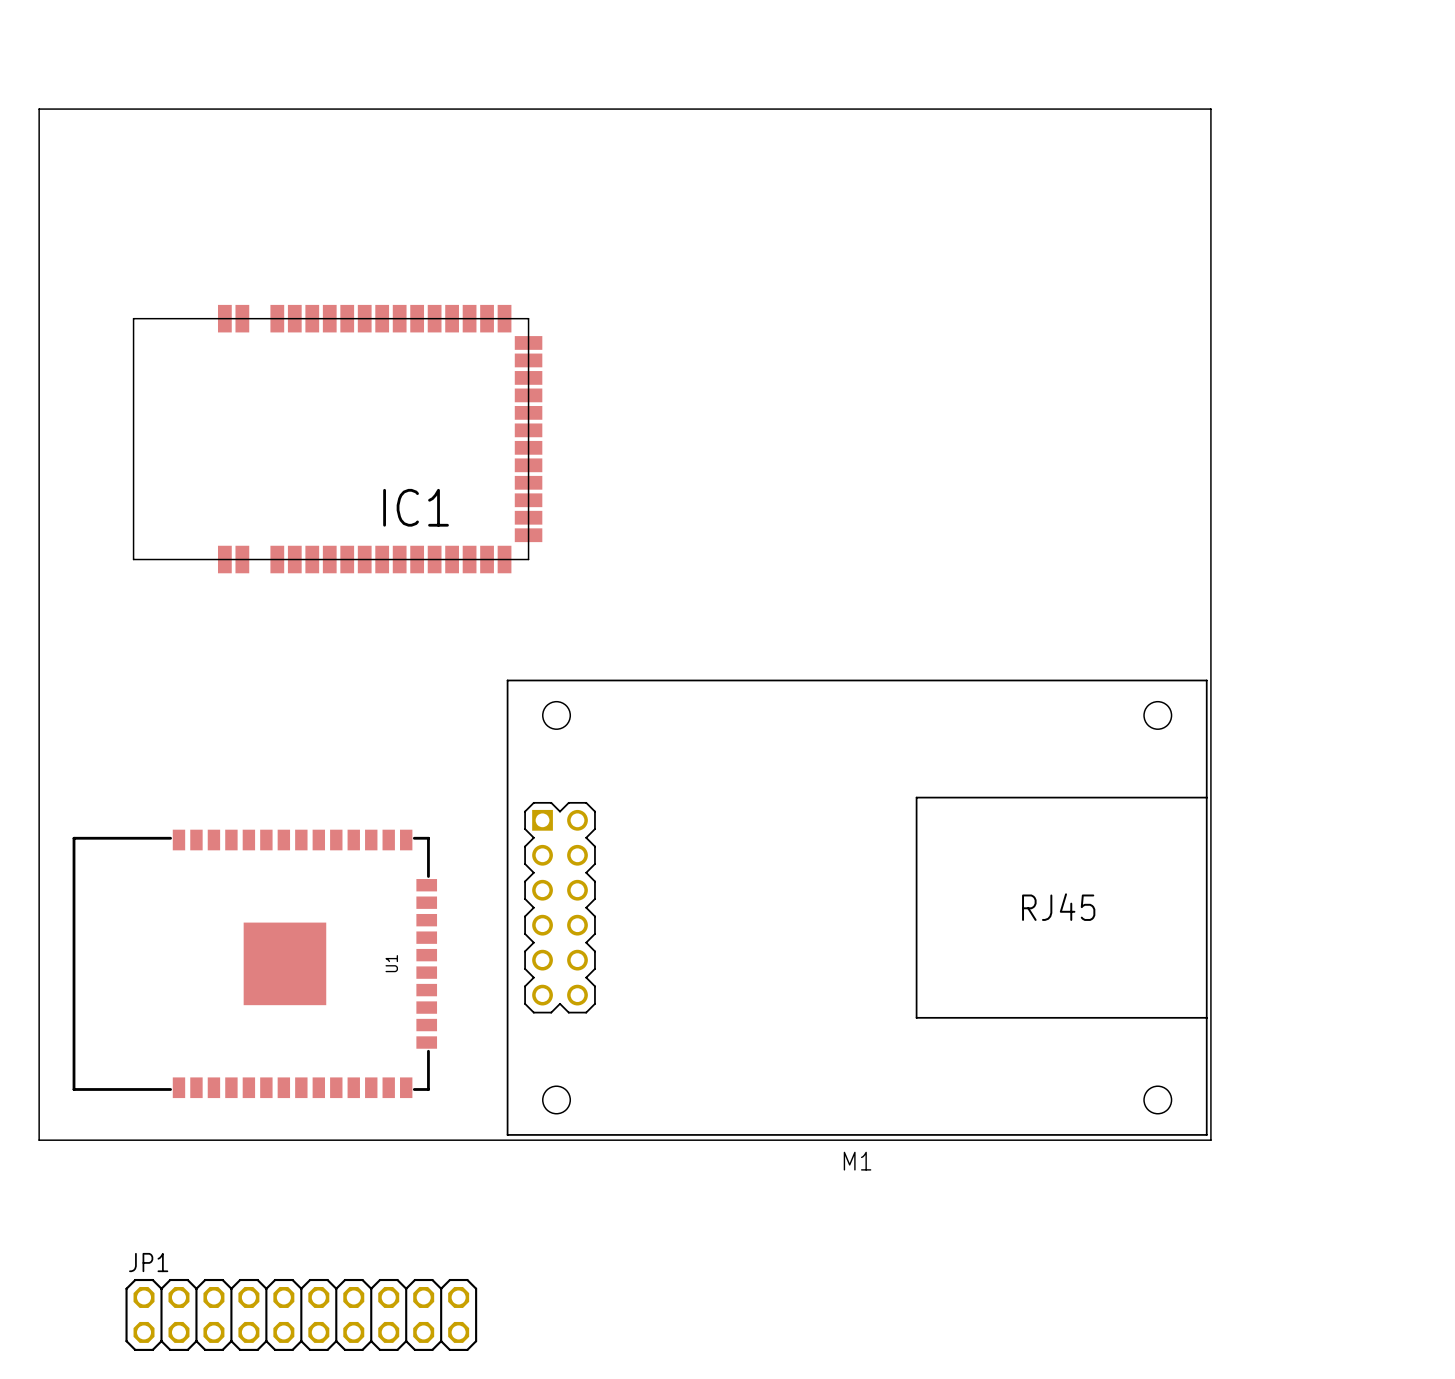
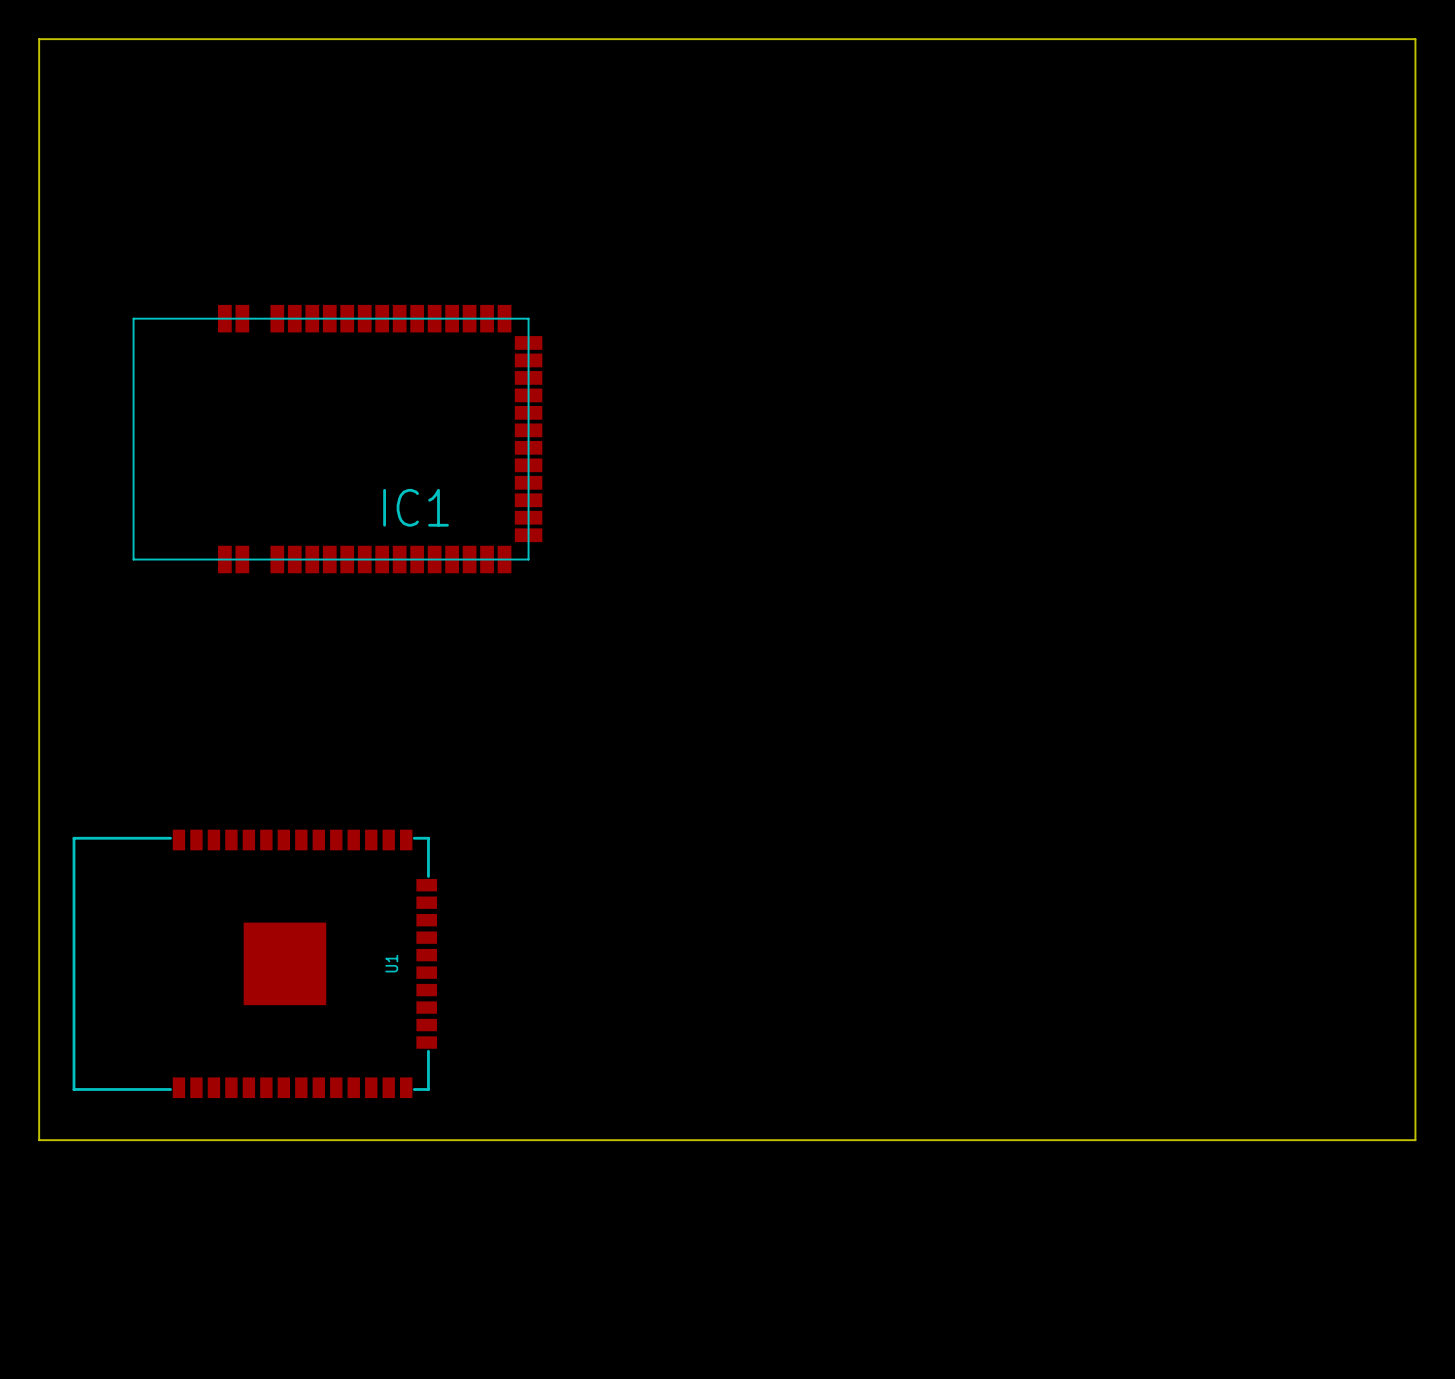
board edge: (39, 109) (1210, 109) (1210, 1140) -> (39, 109) (39, 39) (1415, 39) (1415, 1140) (1210, 1140)
M1: (857, 907) -> none
JP1: (301, 1314) -> none

